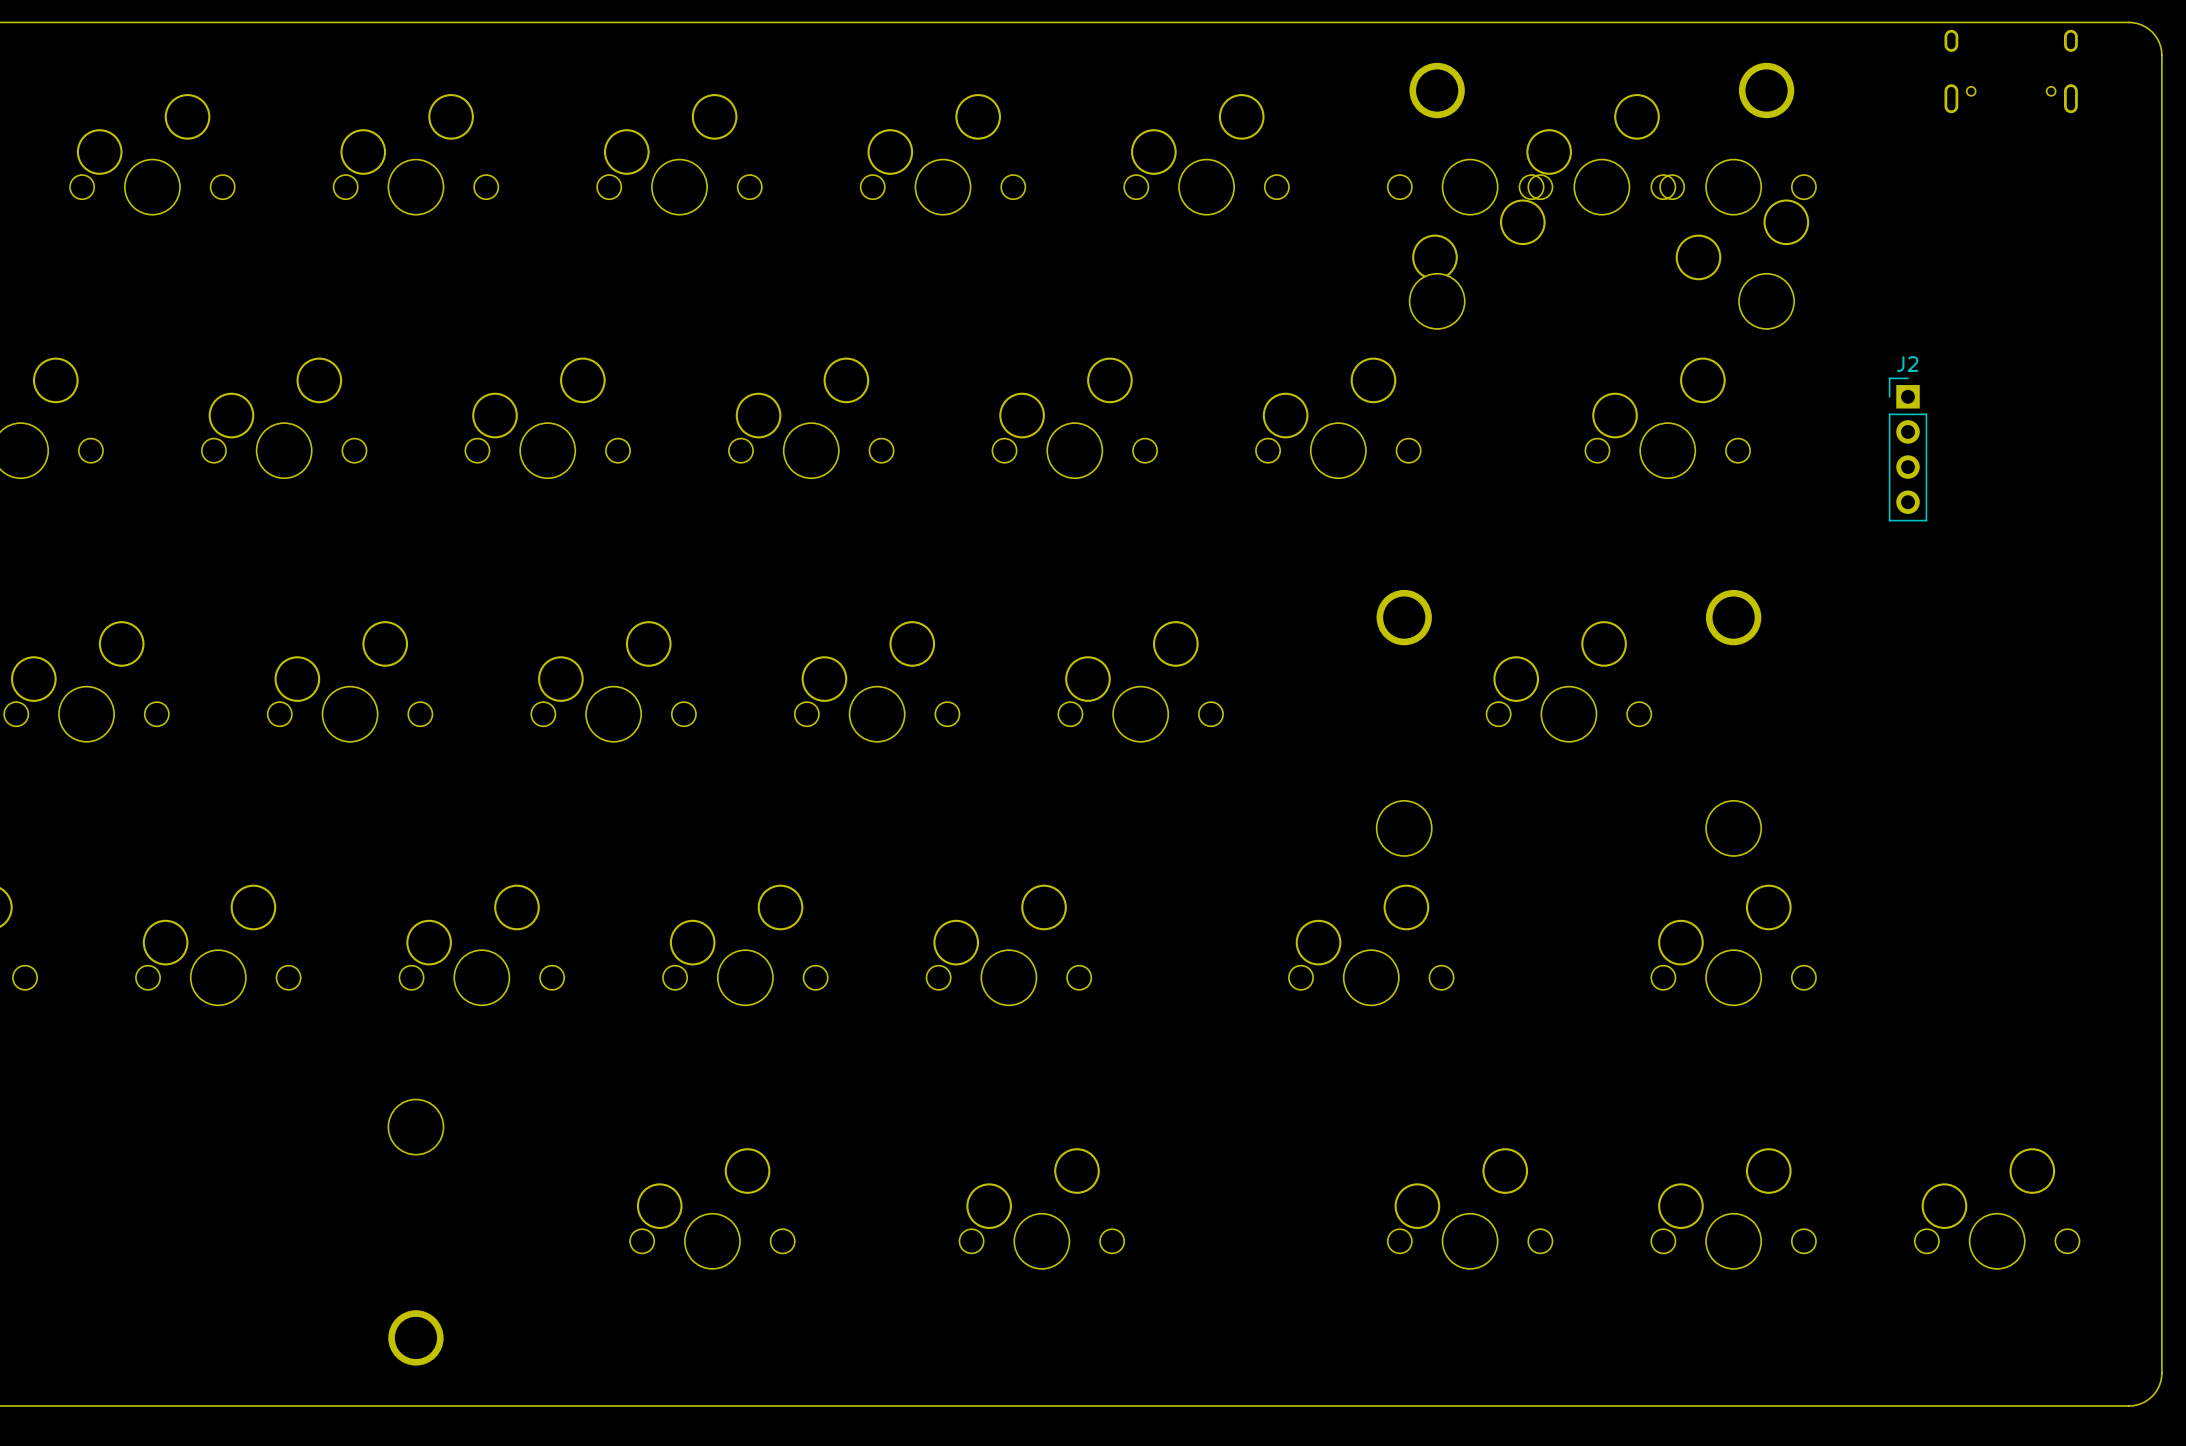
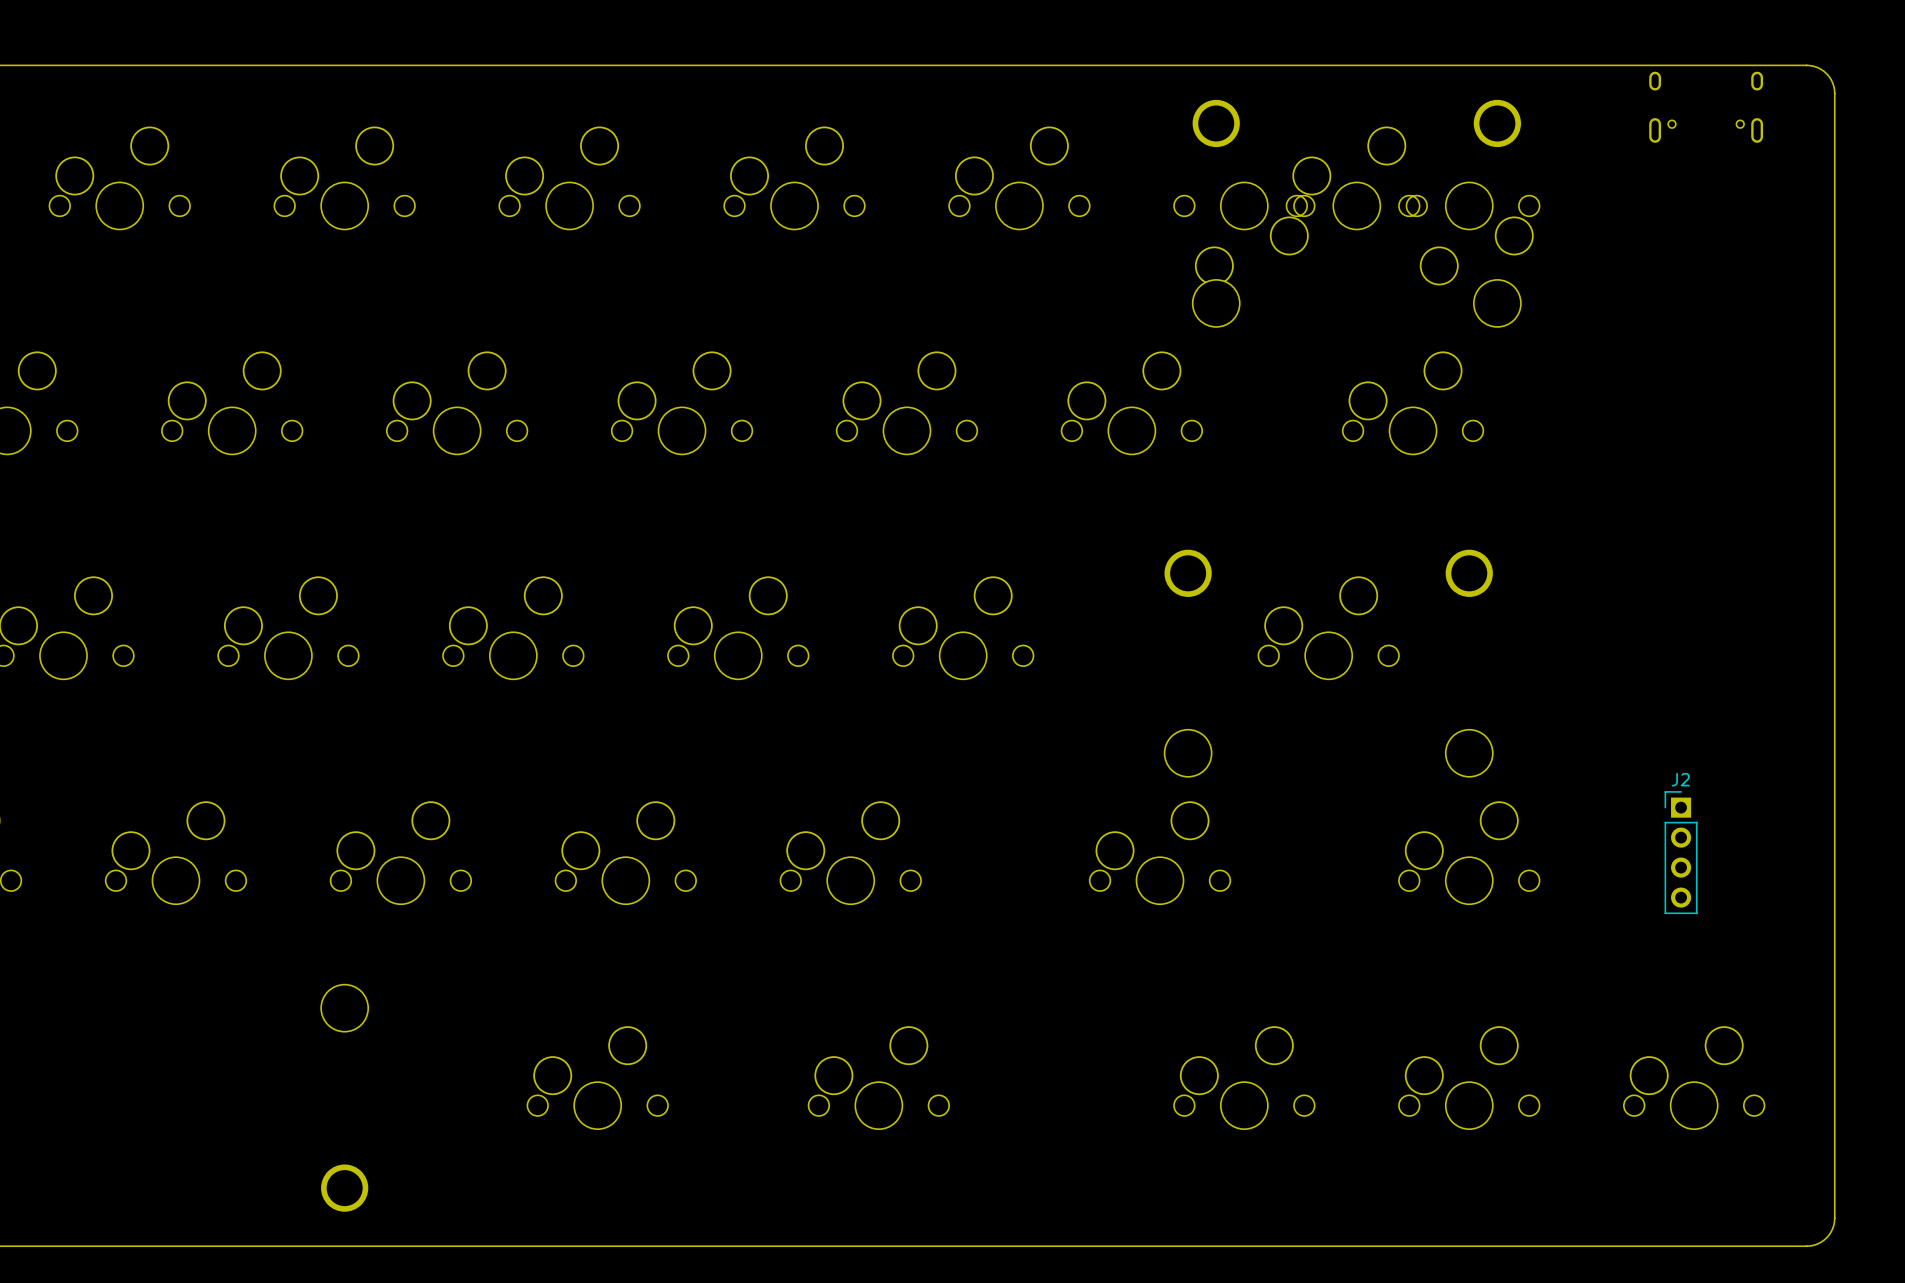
J2 position: (1908, 449) -> (1681, 852)

